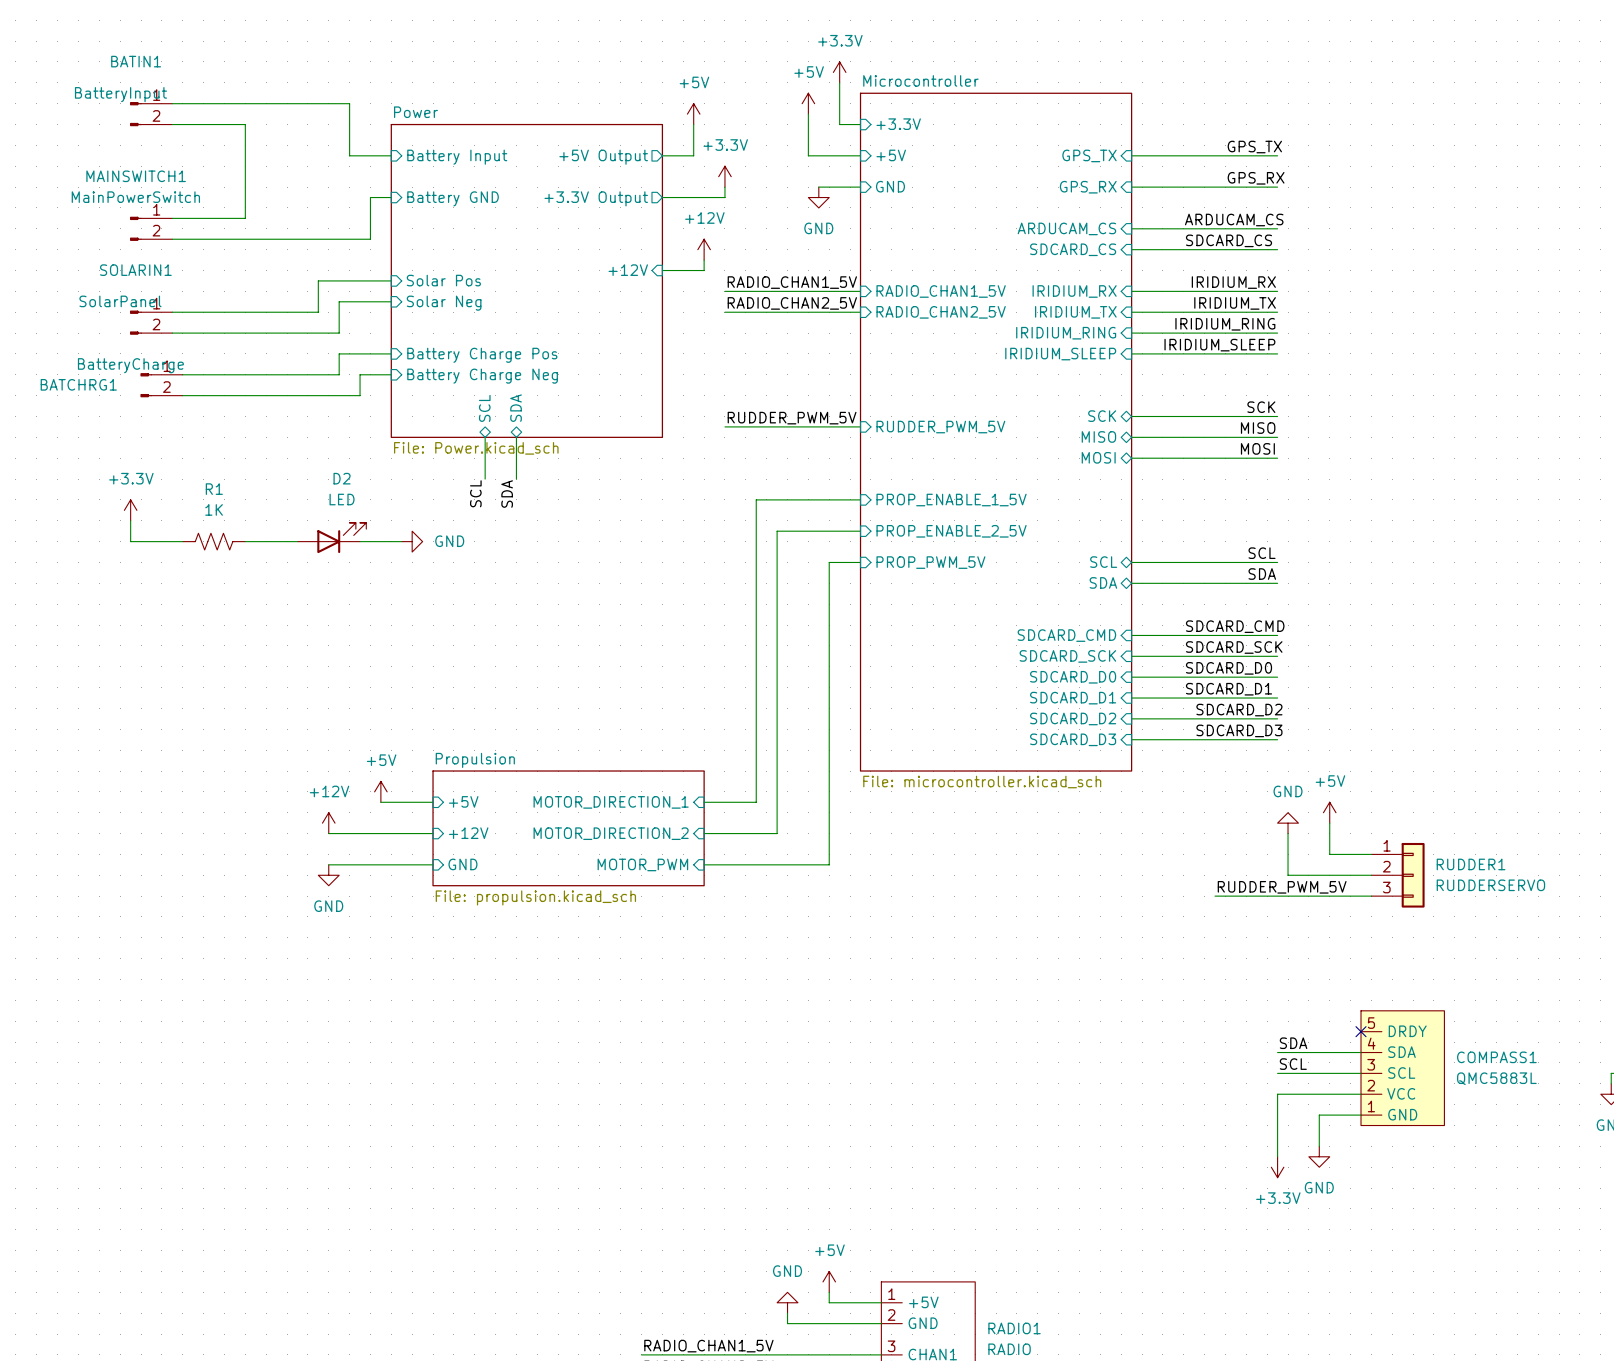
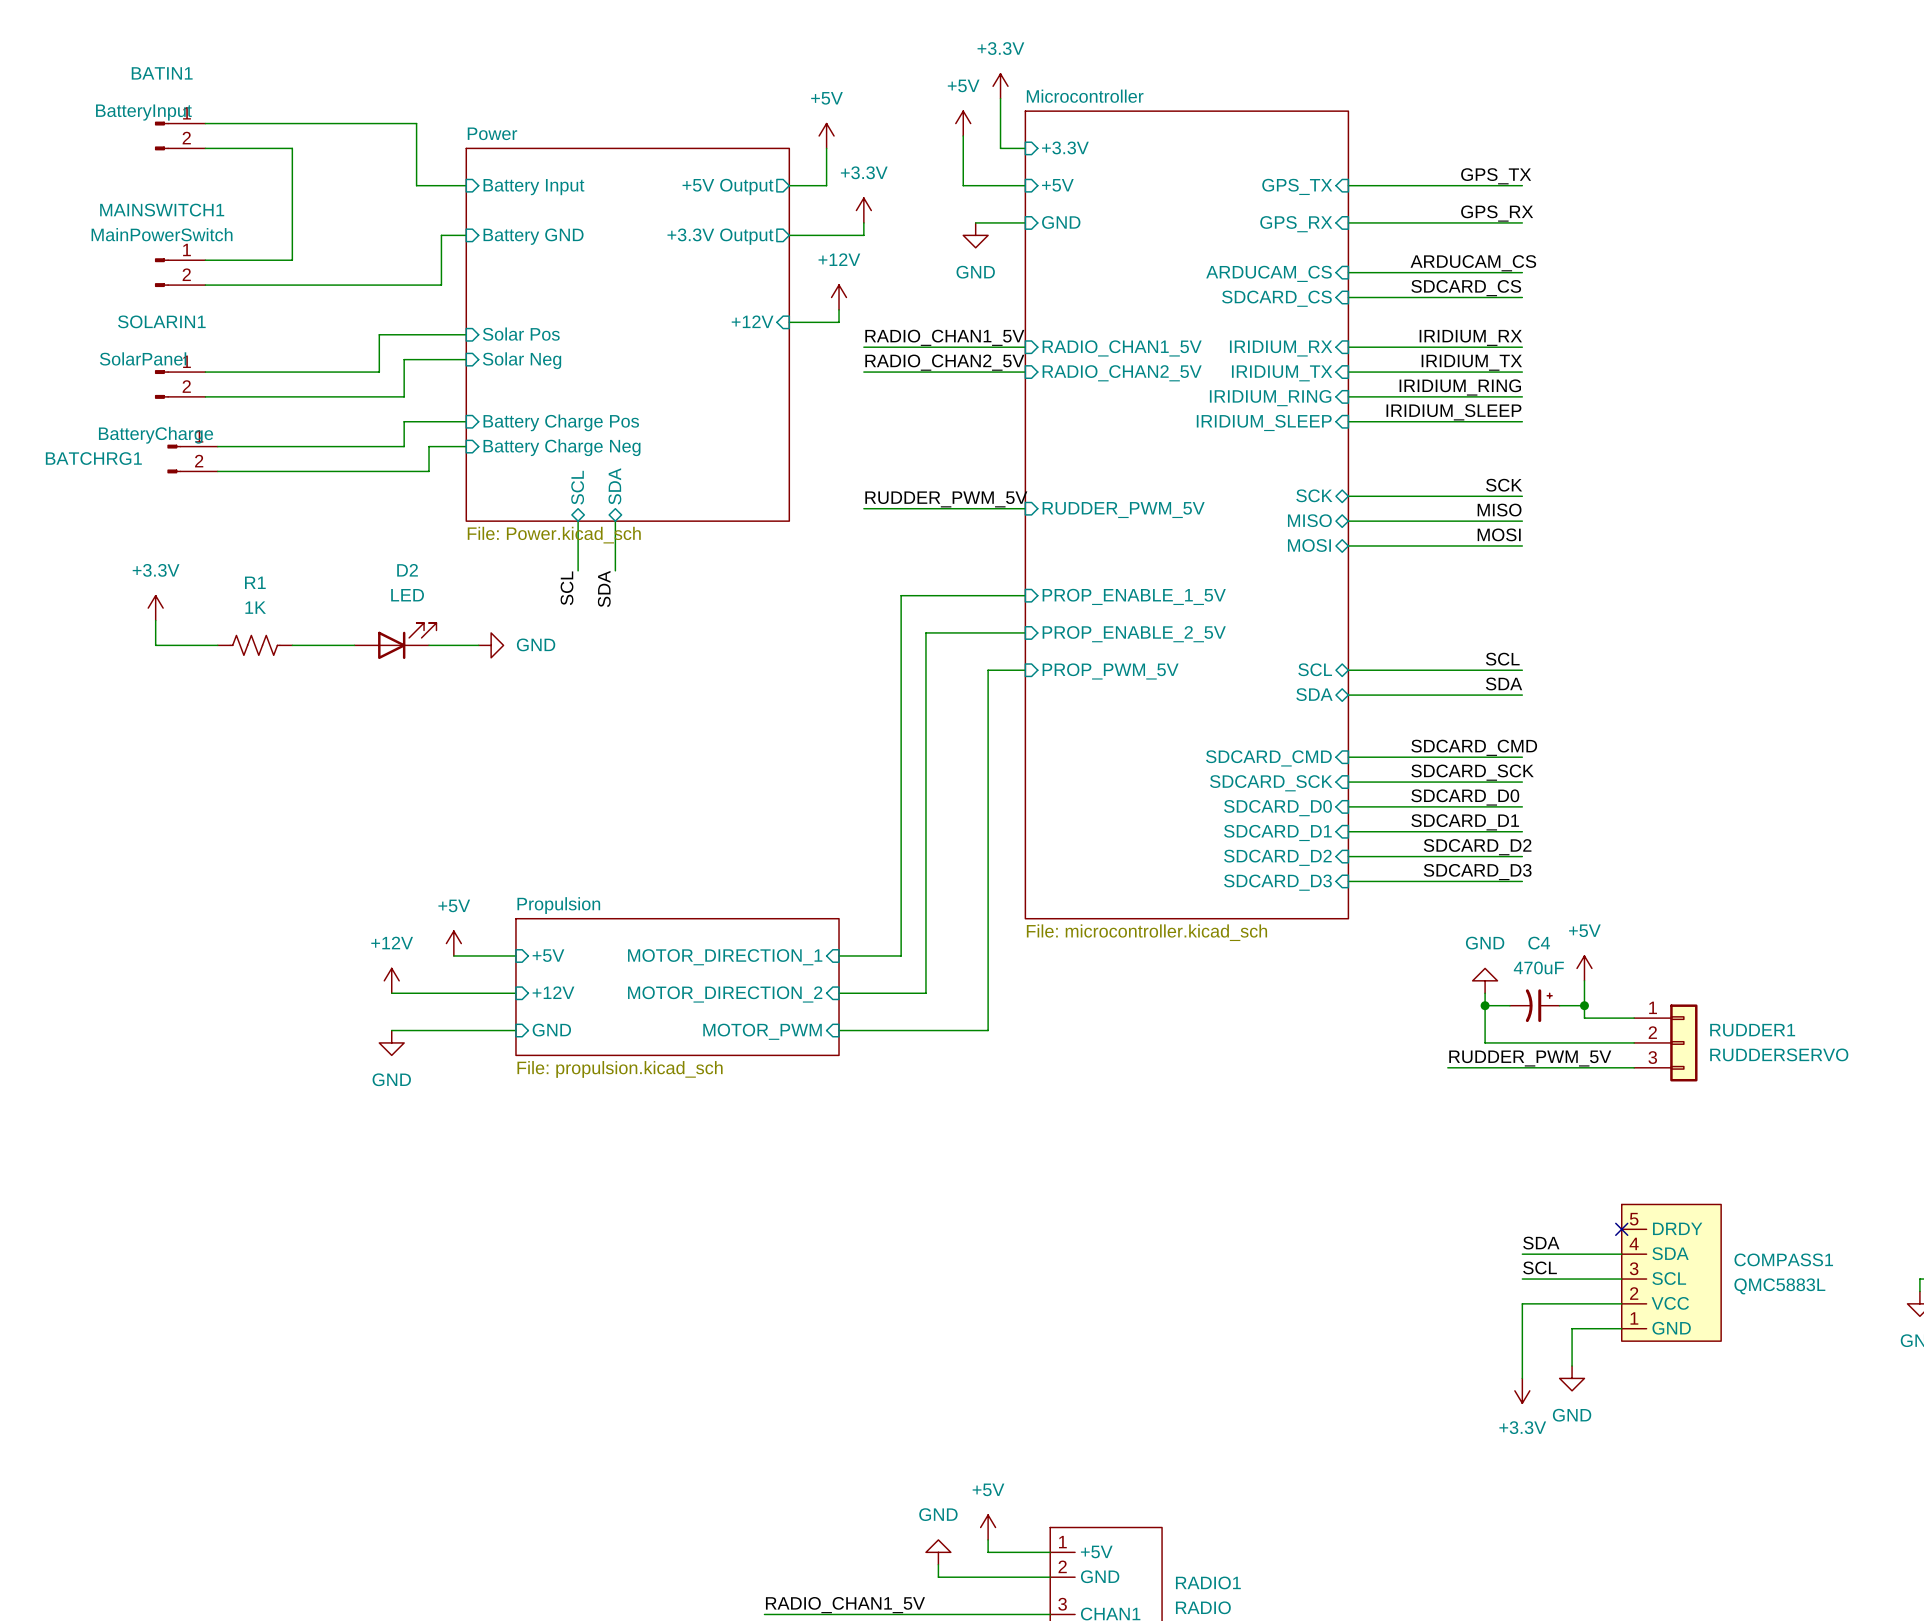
power symbol position: GND (1288, 823) -> GND (1485, 980)
wire: (1288, 833) (1288, 875) -> (1485, 993) (1485, 1042) (1534, 1042)
wire: none -> (1485, 1005) (1509, 1005)
junction: none -> (1485, 1005)
C4: none -> 470uF (1534, 1005)
wire: none -> (1559, 1005) (1584, 1005)
junction: none -> (1584, 1005)

